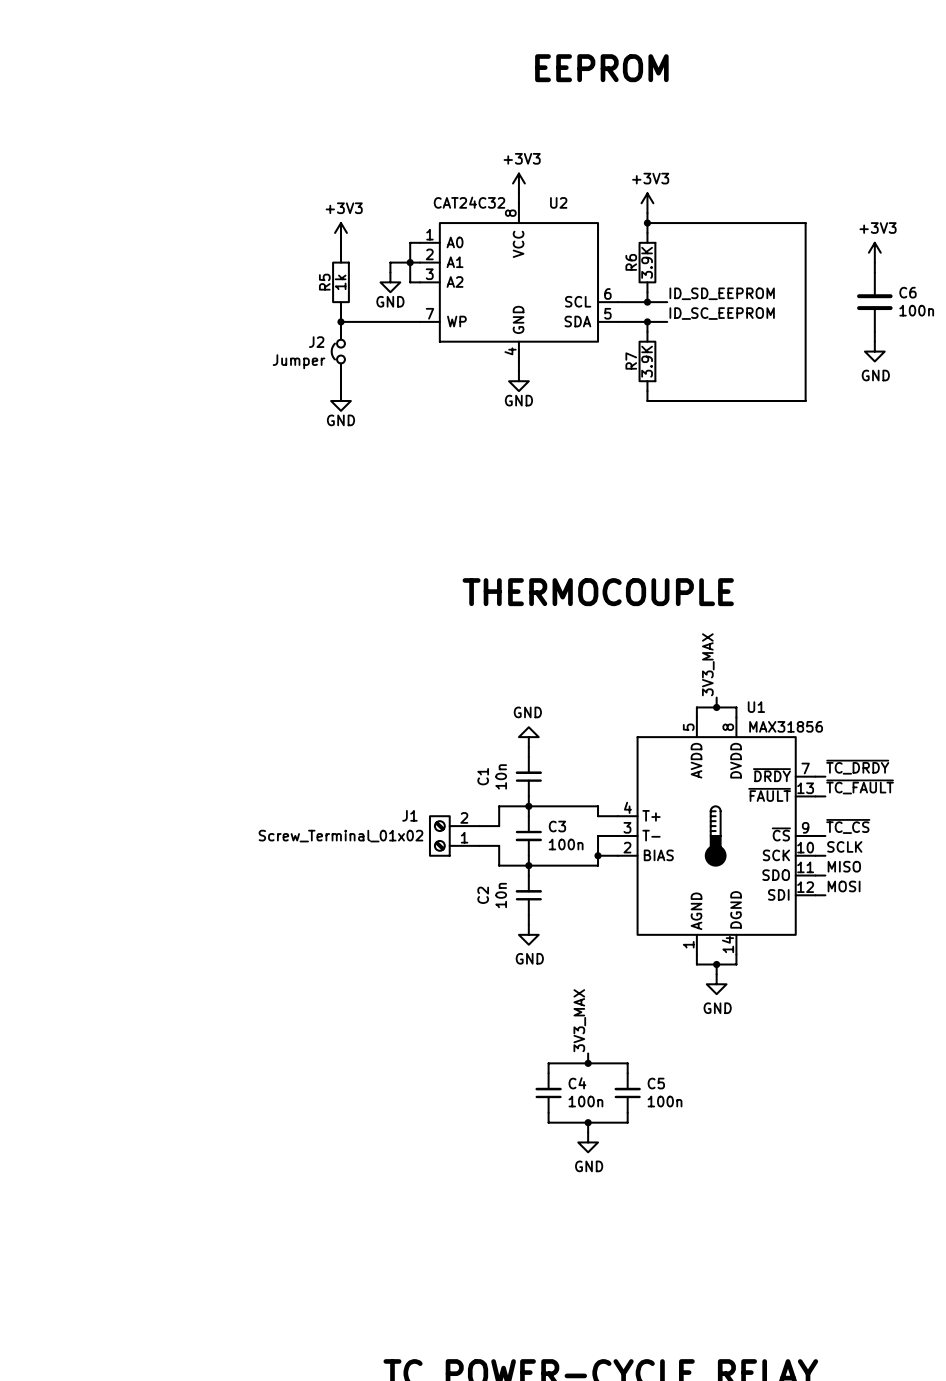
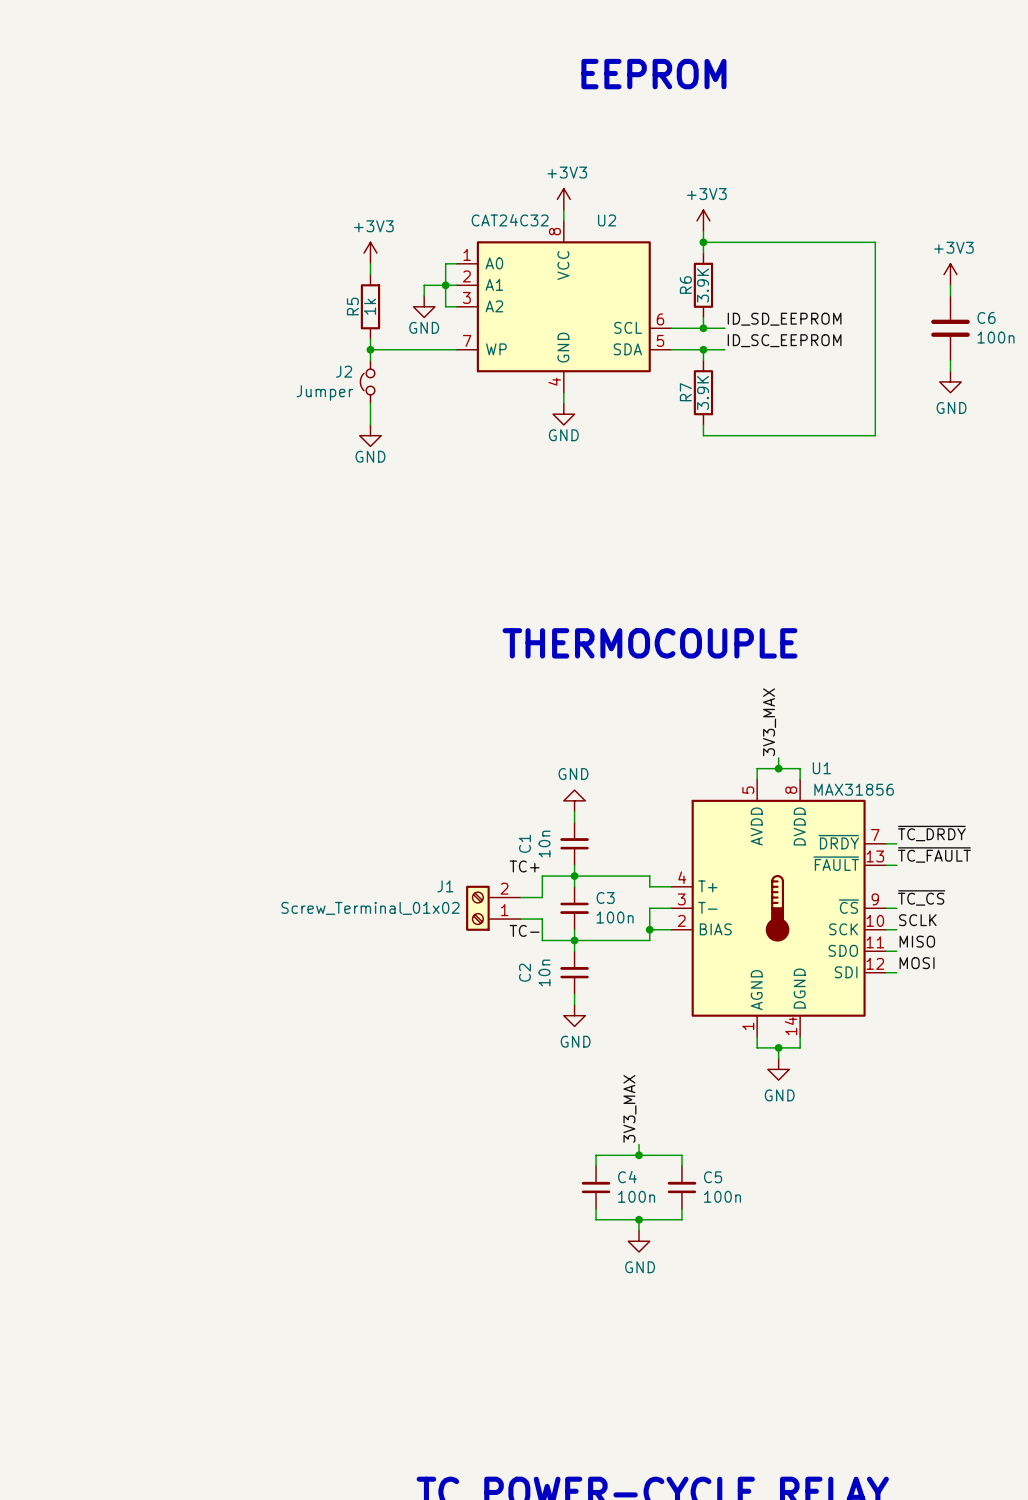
label: none -> TC+ (524, 866)
label: none -> TC- (524, 930)

